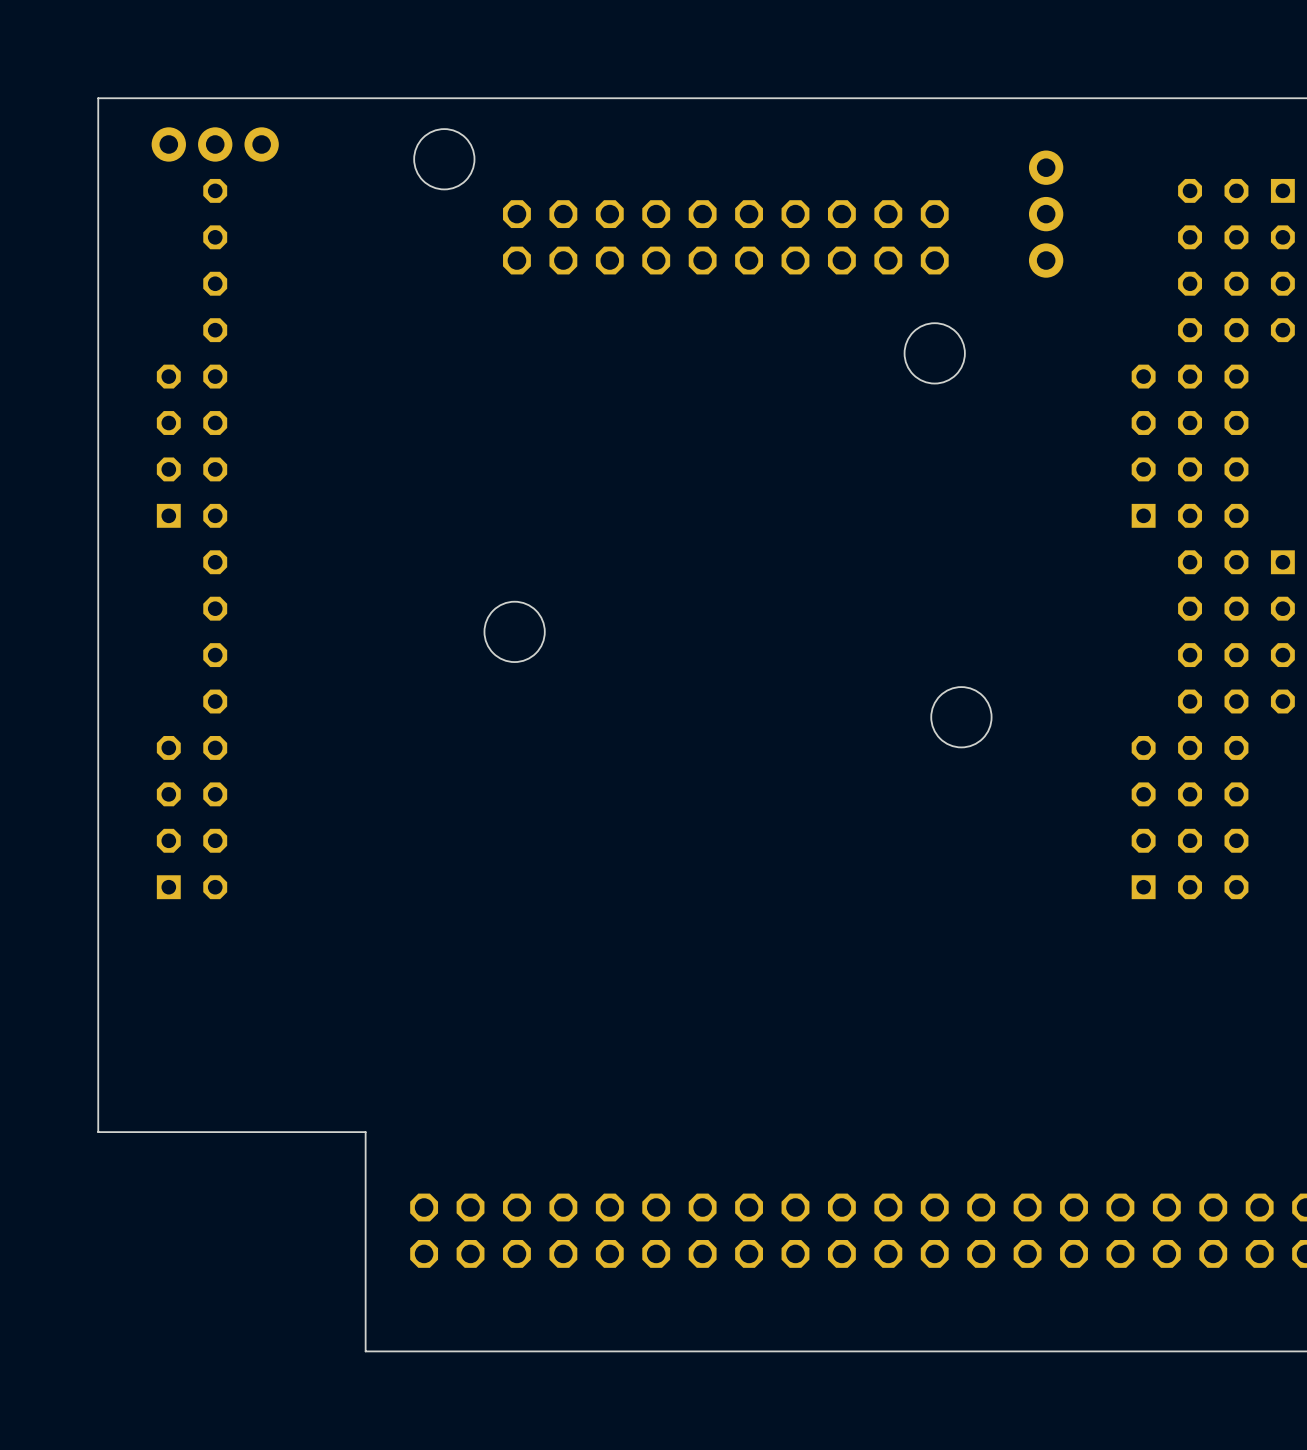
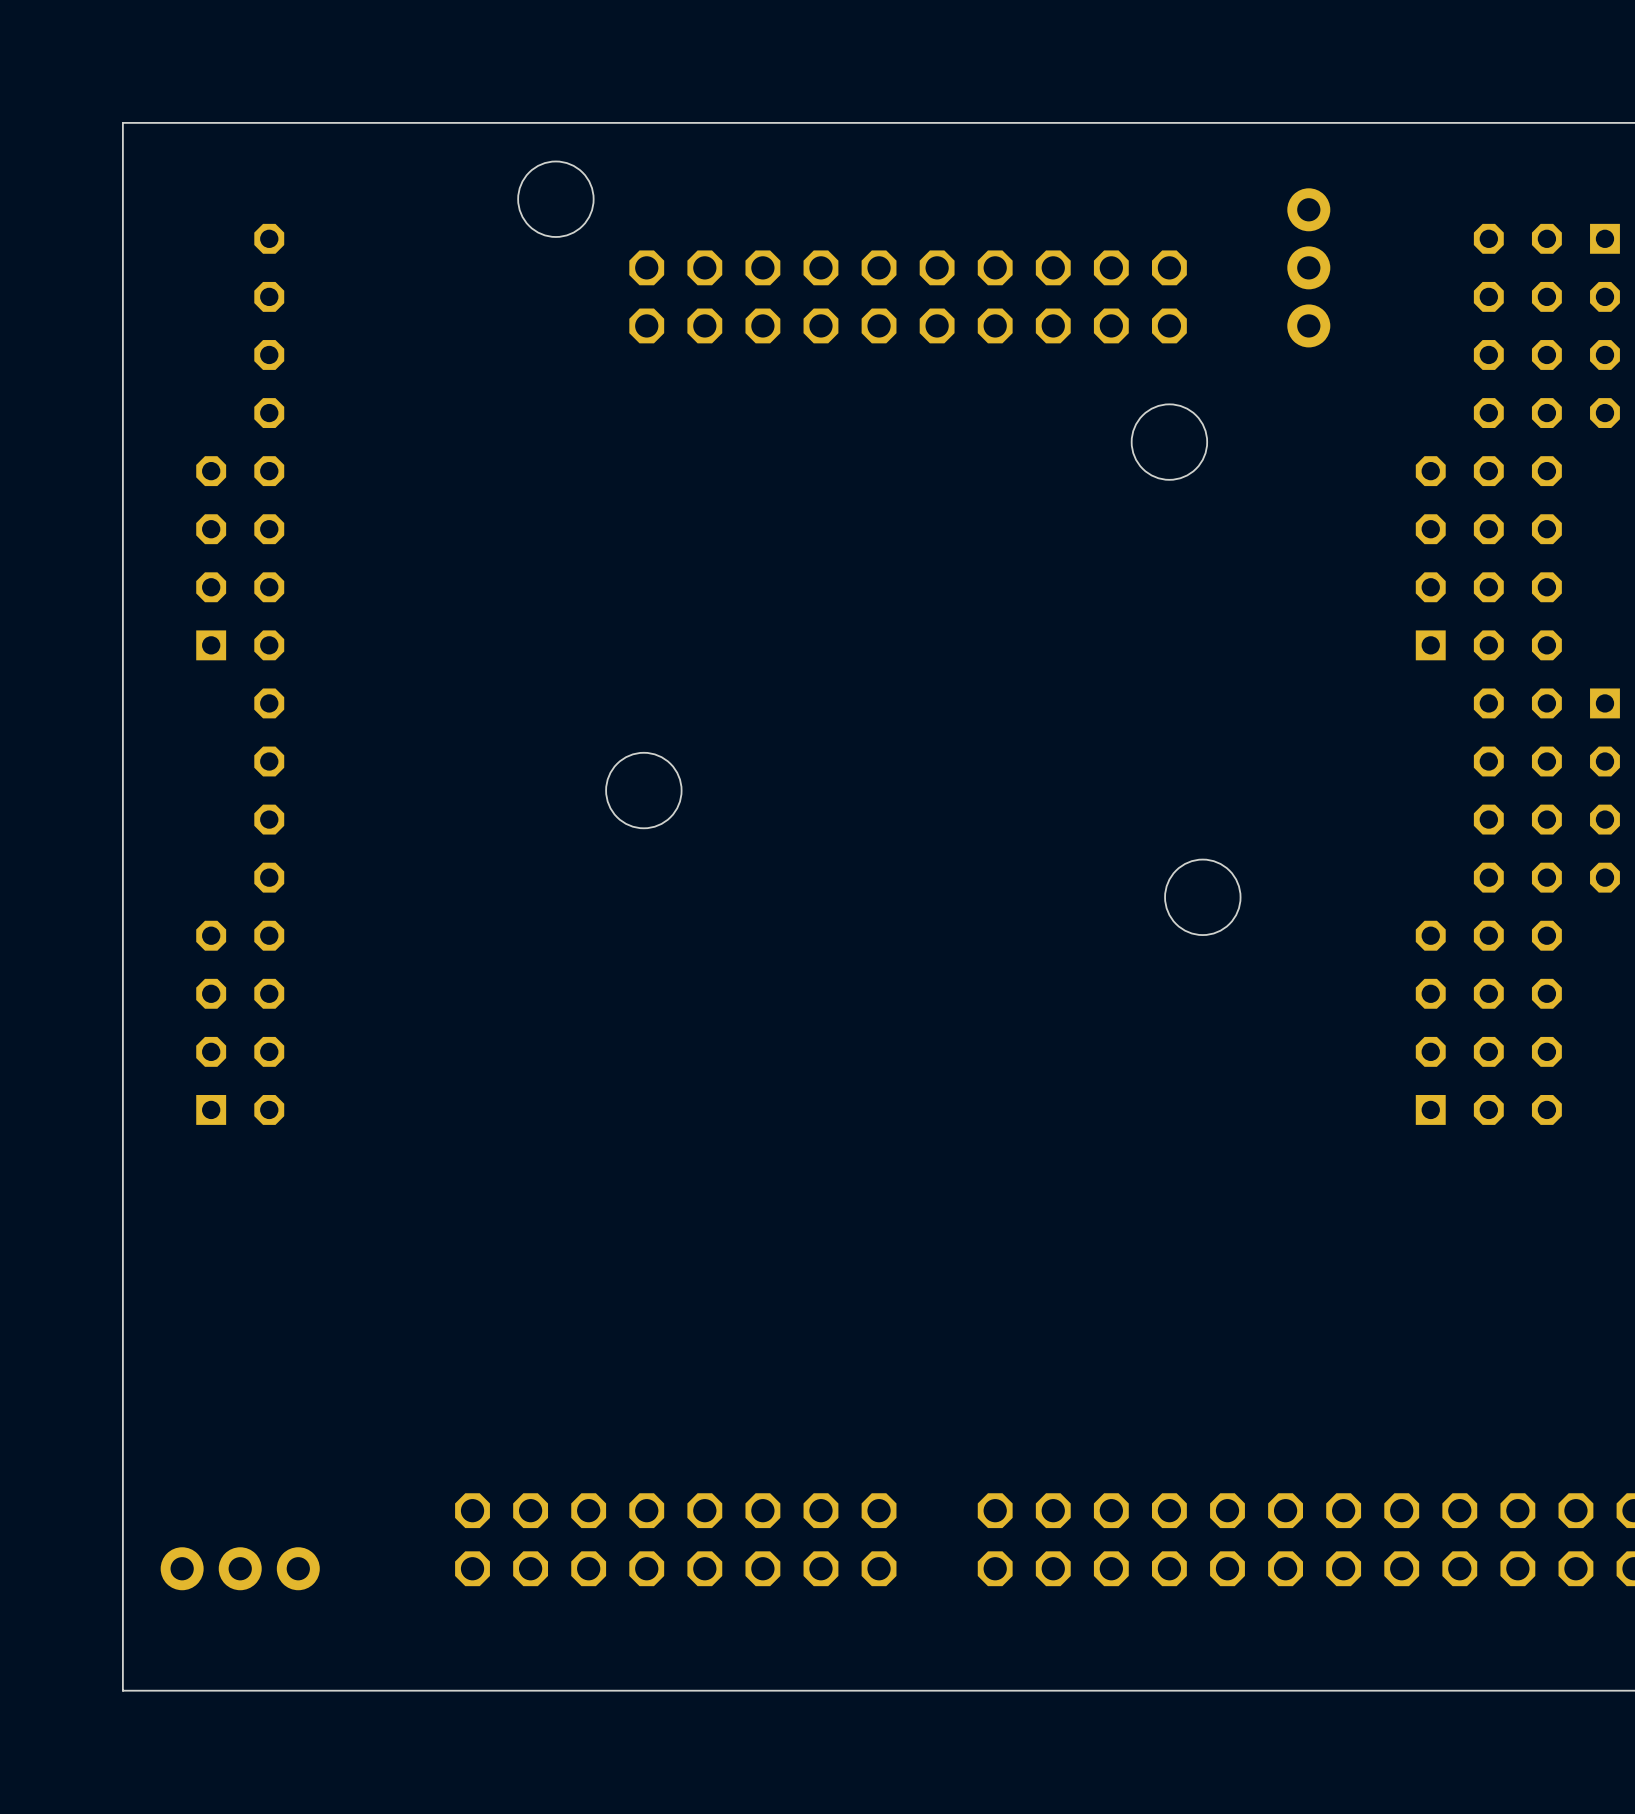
part: (215, 144) -> none
board edge: (98, 1132) (365, 1132) (365, 1351) -> (122, 1416) (122, 1690) (457, 1690)
part position: (586, 1230) -> (675, 1539)
part: none -> (240, 1568)

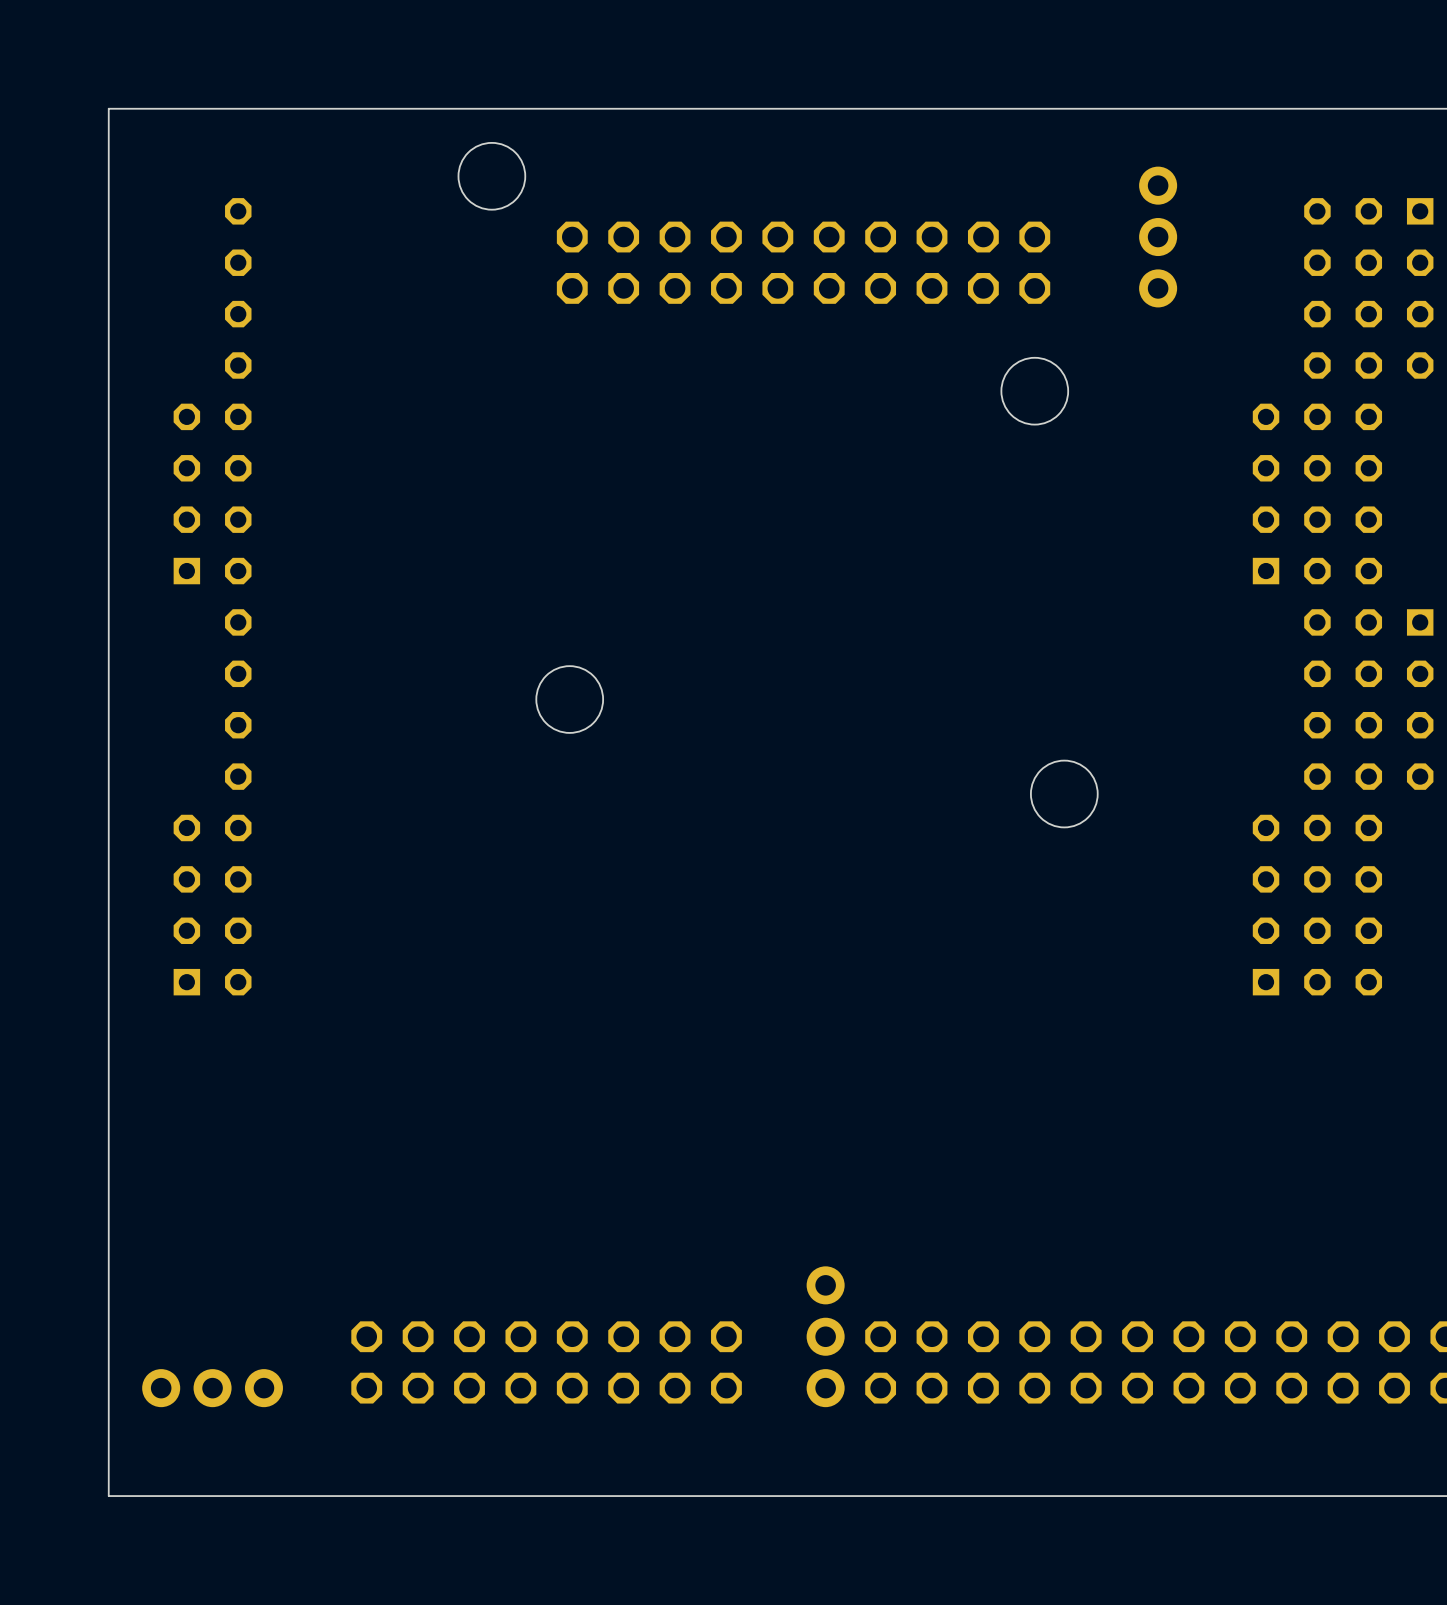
part: none -> (825, 1336)
part position: (675, 1539) -> (546, 1362)

